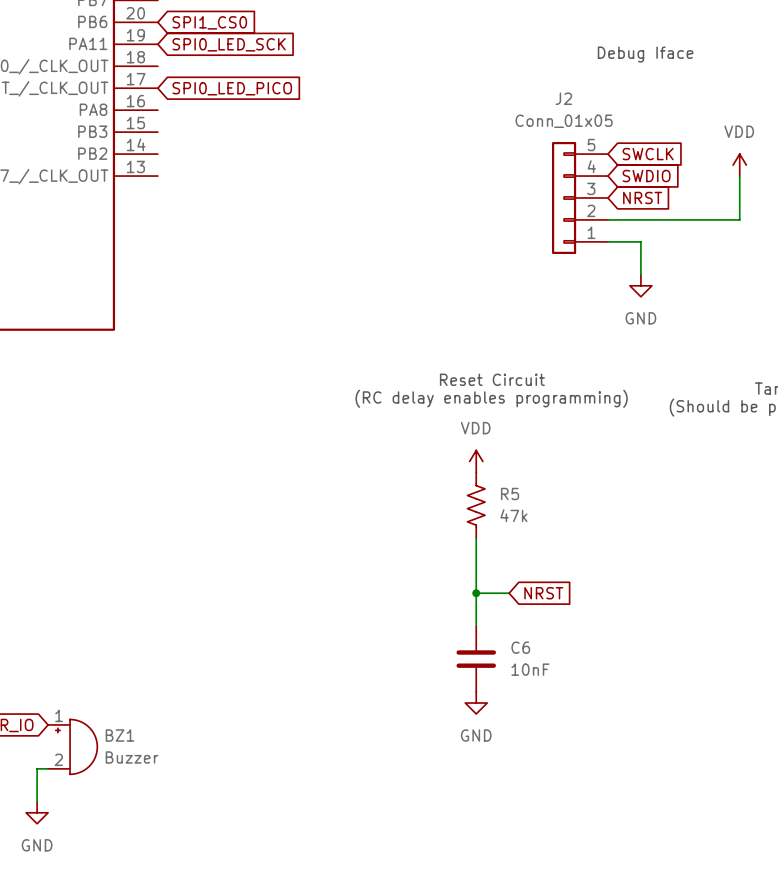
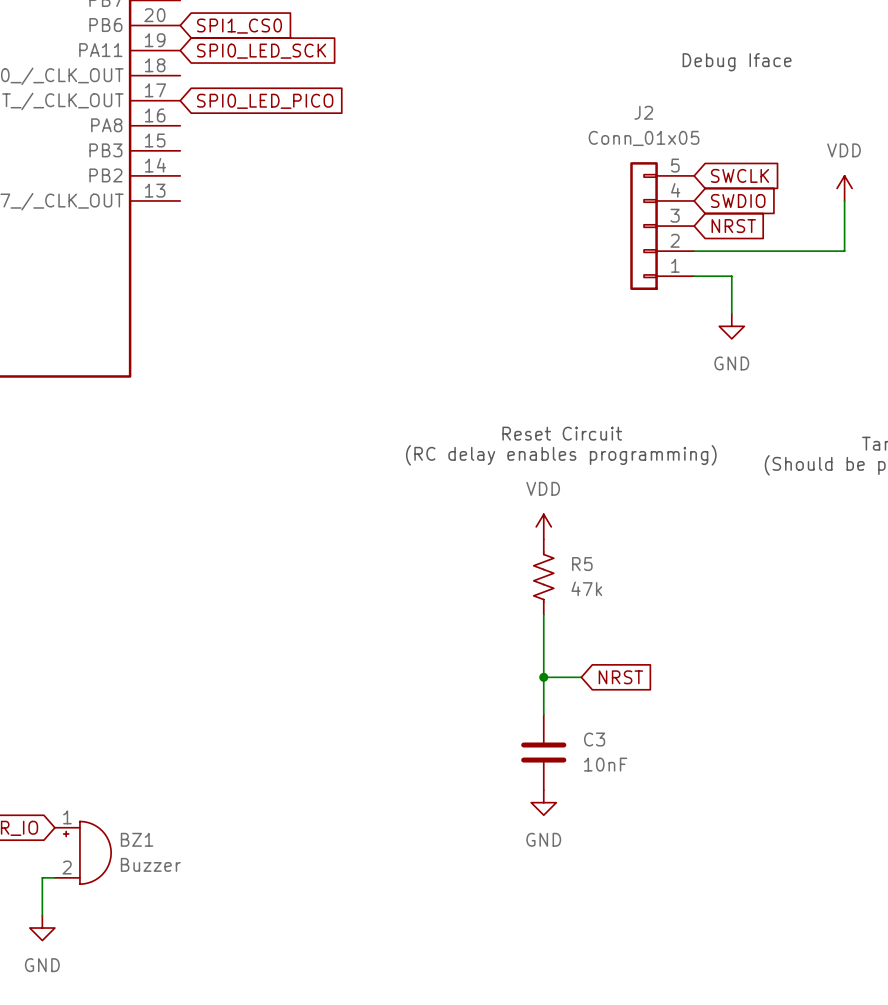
C6 name: C6 (520, 647) -> C3 (594, 739)

